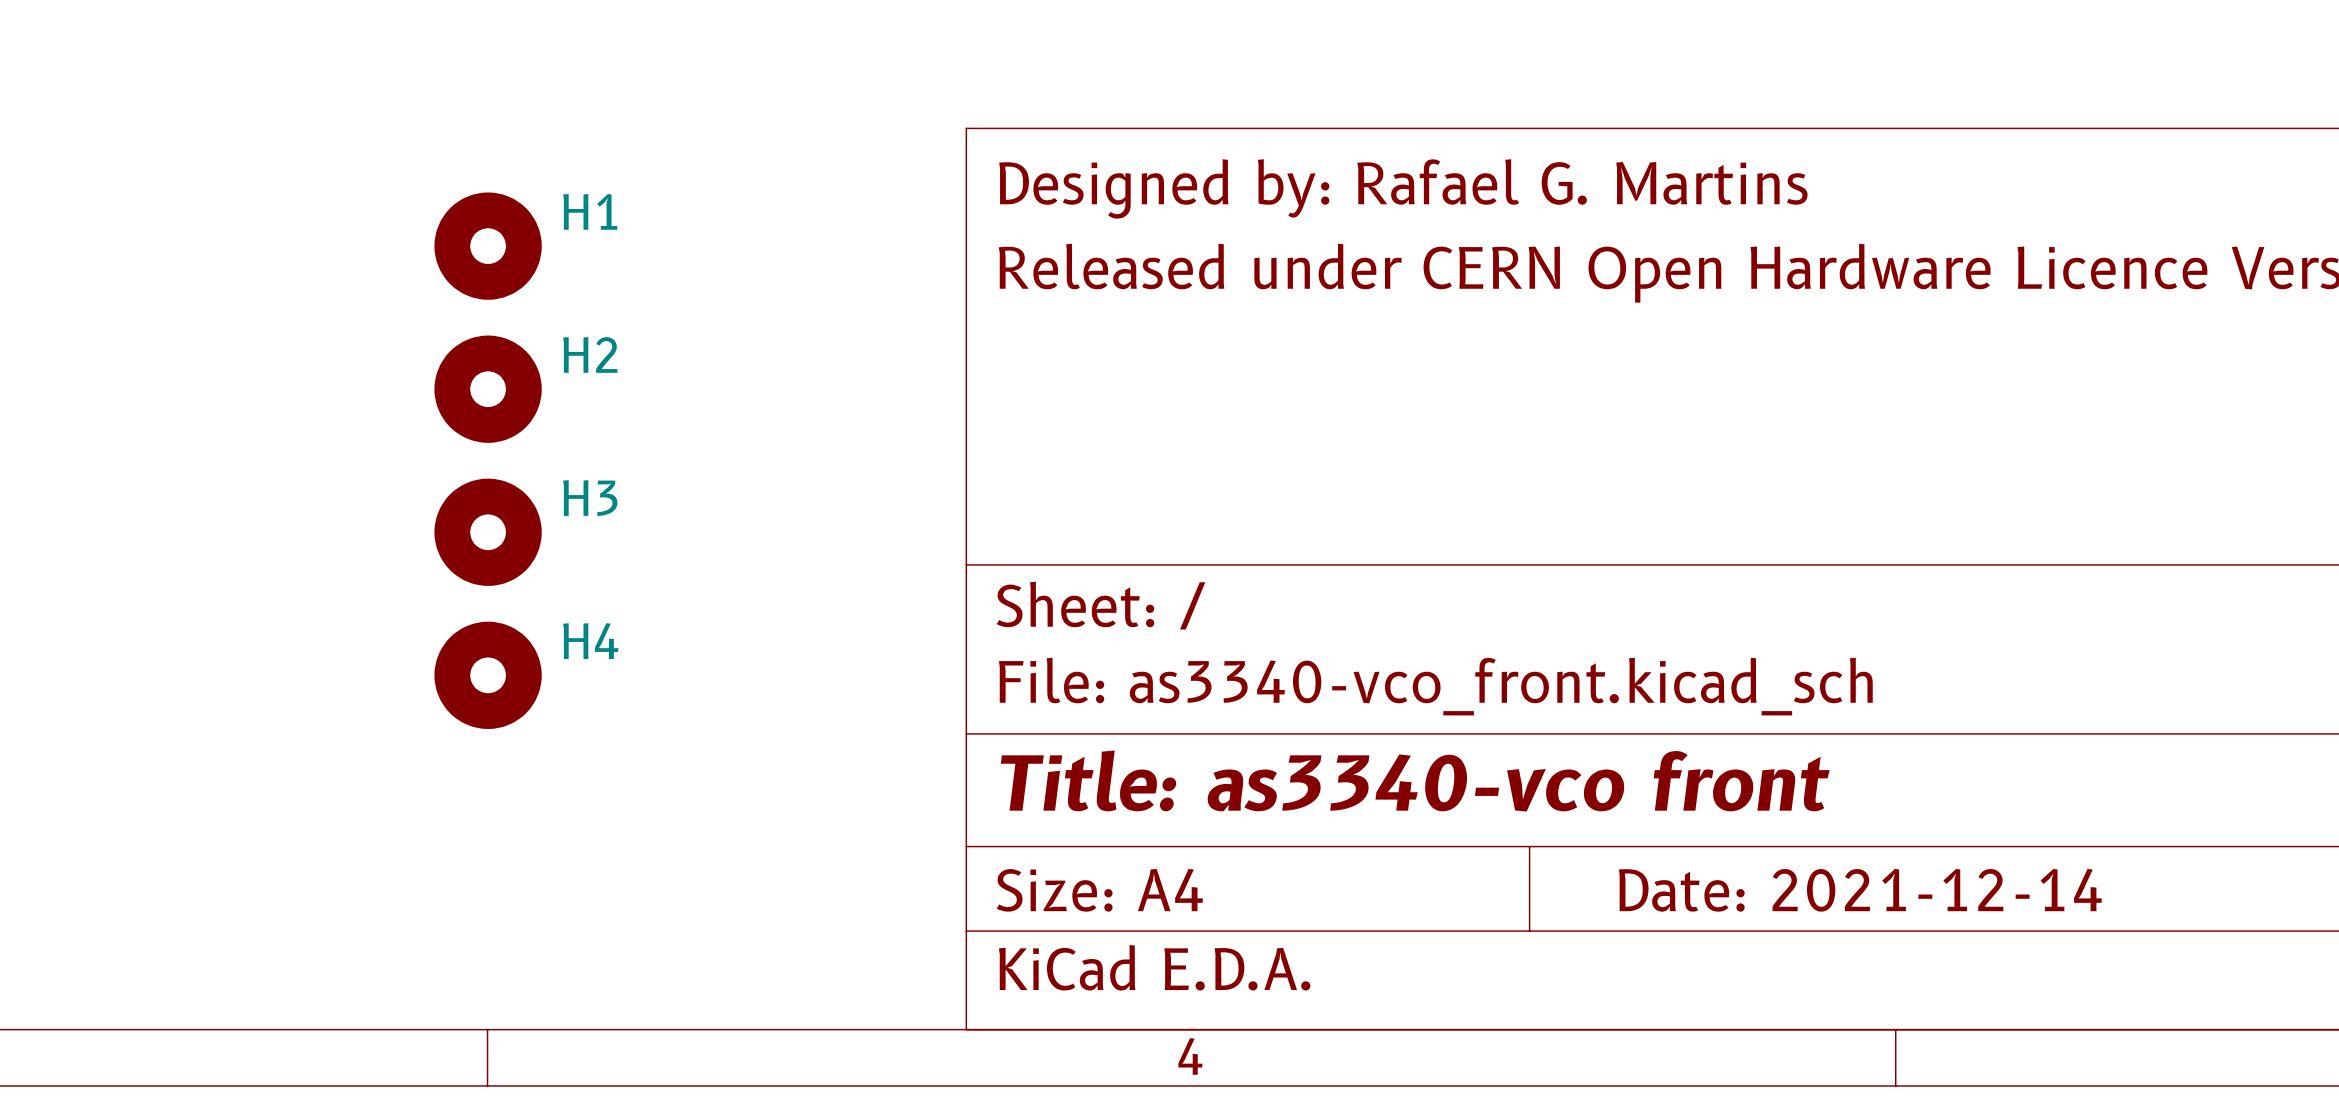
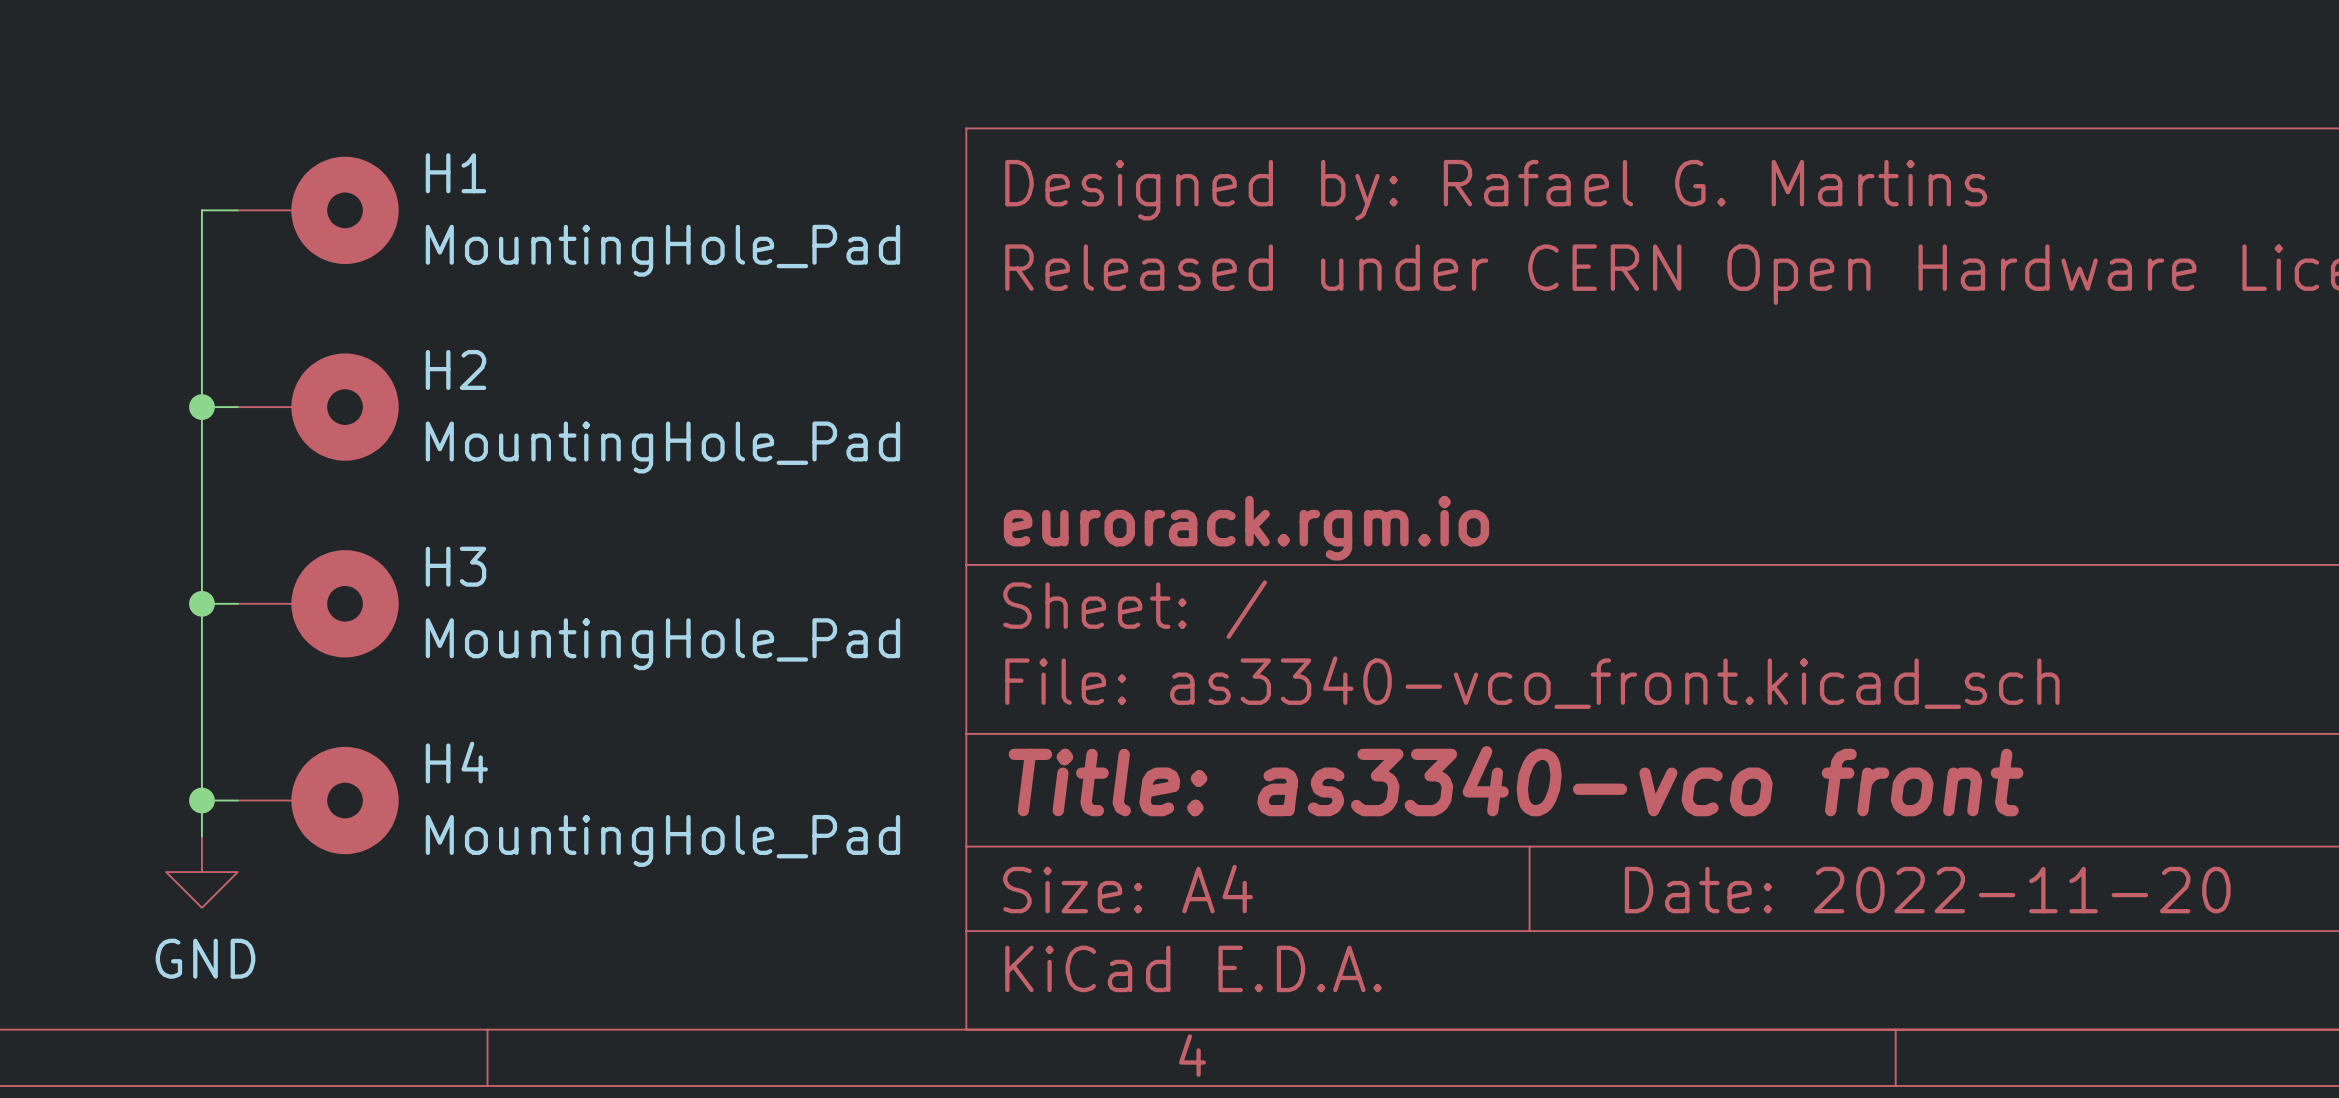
H1 symbol: [434, 192, 542, 300] -> [237, 156, 399, 265]
wire: none -> (237, 210) (201, 210) (201, 836)
H1 value: none -> MountingHole_Pad (662, 250)
H2 symbol: [434, 335, 542, 443] -> [237, 353, 399, 461]
wire: none -> (201, 407) (237, 407)
junction: none -> (201, 407)
H2 value: none -> MountingHole_Pad (662, 447)
H3 symbol: [434, 478, 542, 586] -> [237, 550, 399, 658]
title block: none -> eurorack.rgm.io (1246, 528)
wire: none -> (201, 603) (237, 603)
junction: none -> (201, 603)
H4 symbol: [434, 621, 542, 729] -> [237, 746, 399, 855]
H3 value: none -> MountingHole_Pad (662, 644)
wire: none -> (201, 800) (237, 800)
junction: none -> (201, 800)
H4 value: none -> MountingHole_Pad (662, 840)
power symbol: none -> GND (201, 872)
title block: Date: 2021-12-14 (1860, 890) -> Date: 2022-11-20 (1927, 890)

